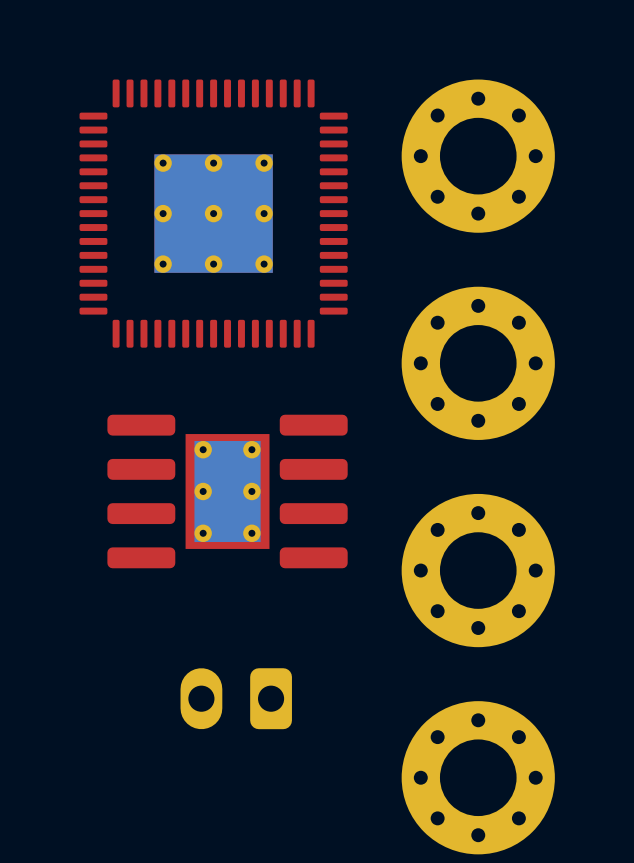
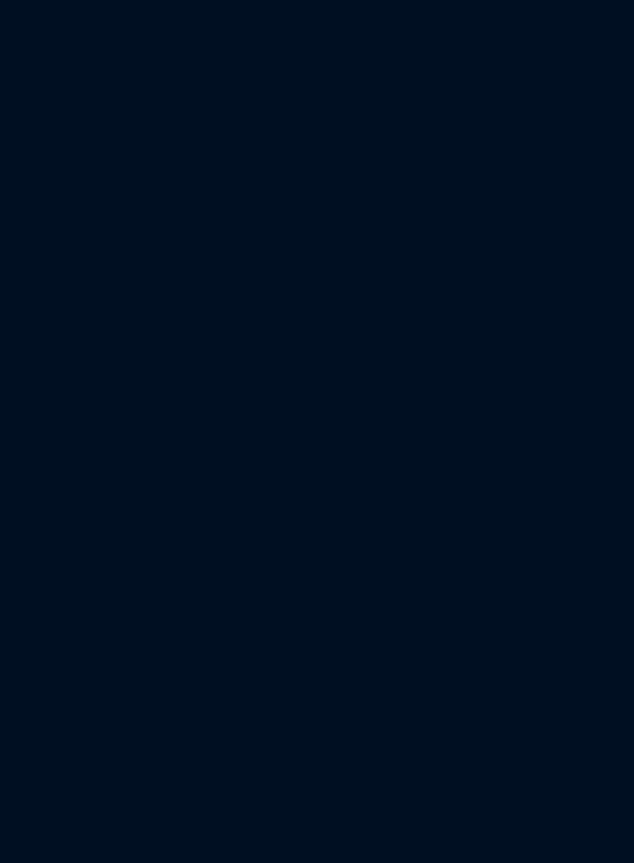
part: (478, 156) -> none
part: (213, 213) -> none
part: (478, 363) -> none
part: (227, 491) -> none
part: (478, 570) -> none
part: (236, 698) -> none
part: (478, 777) -> none

